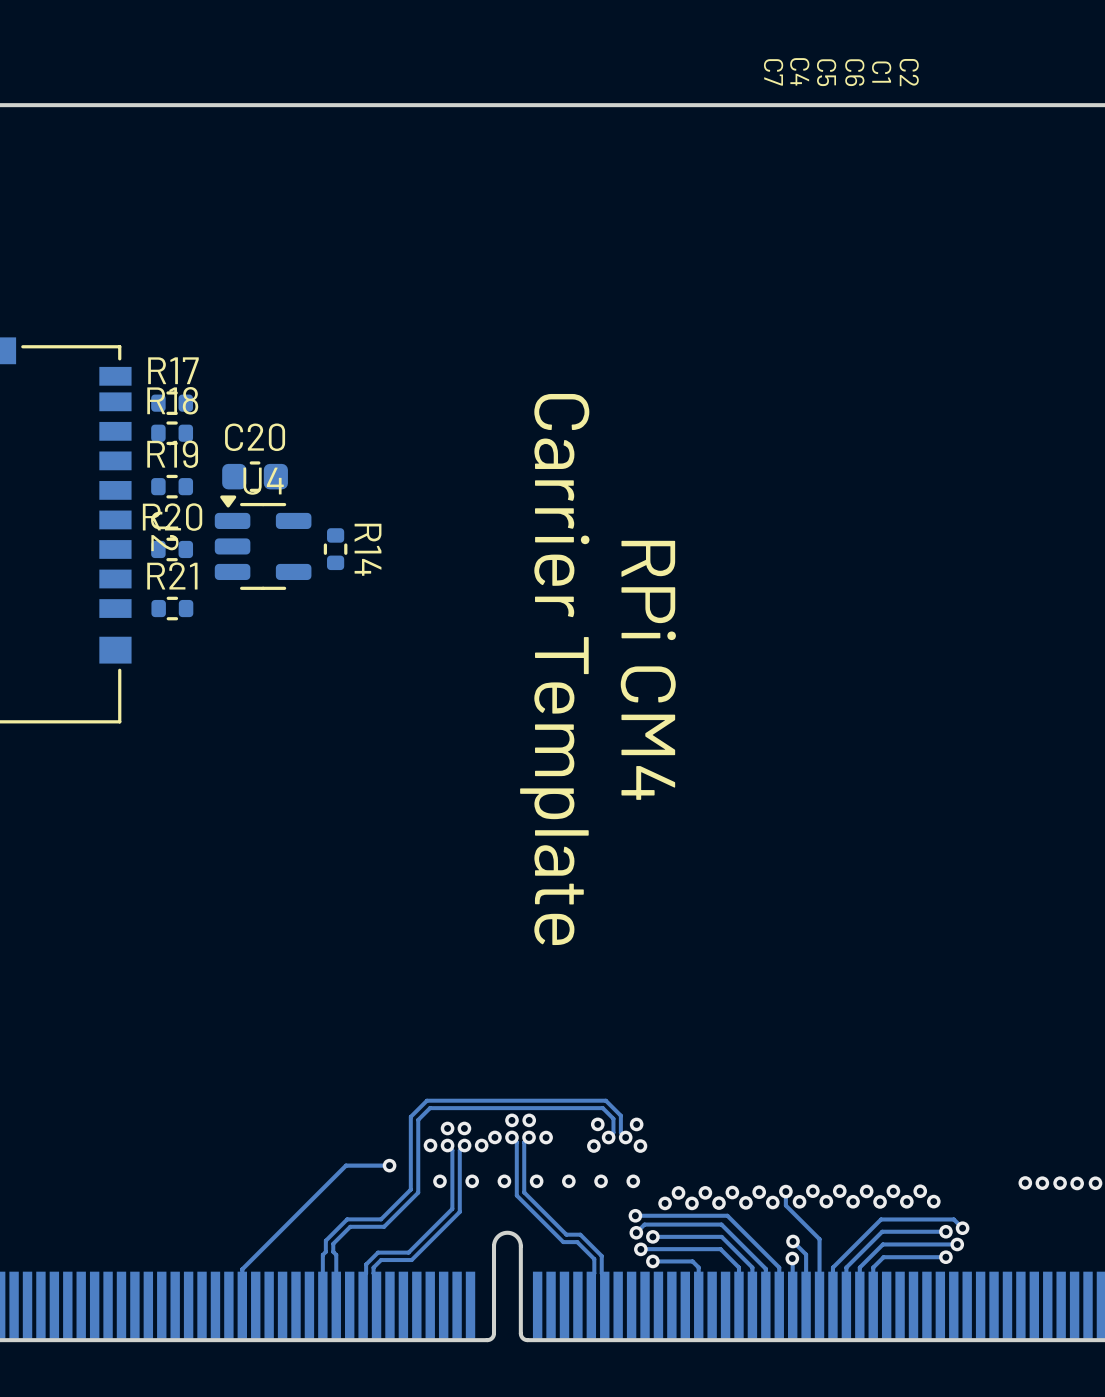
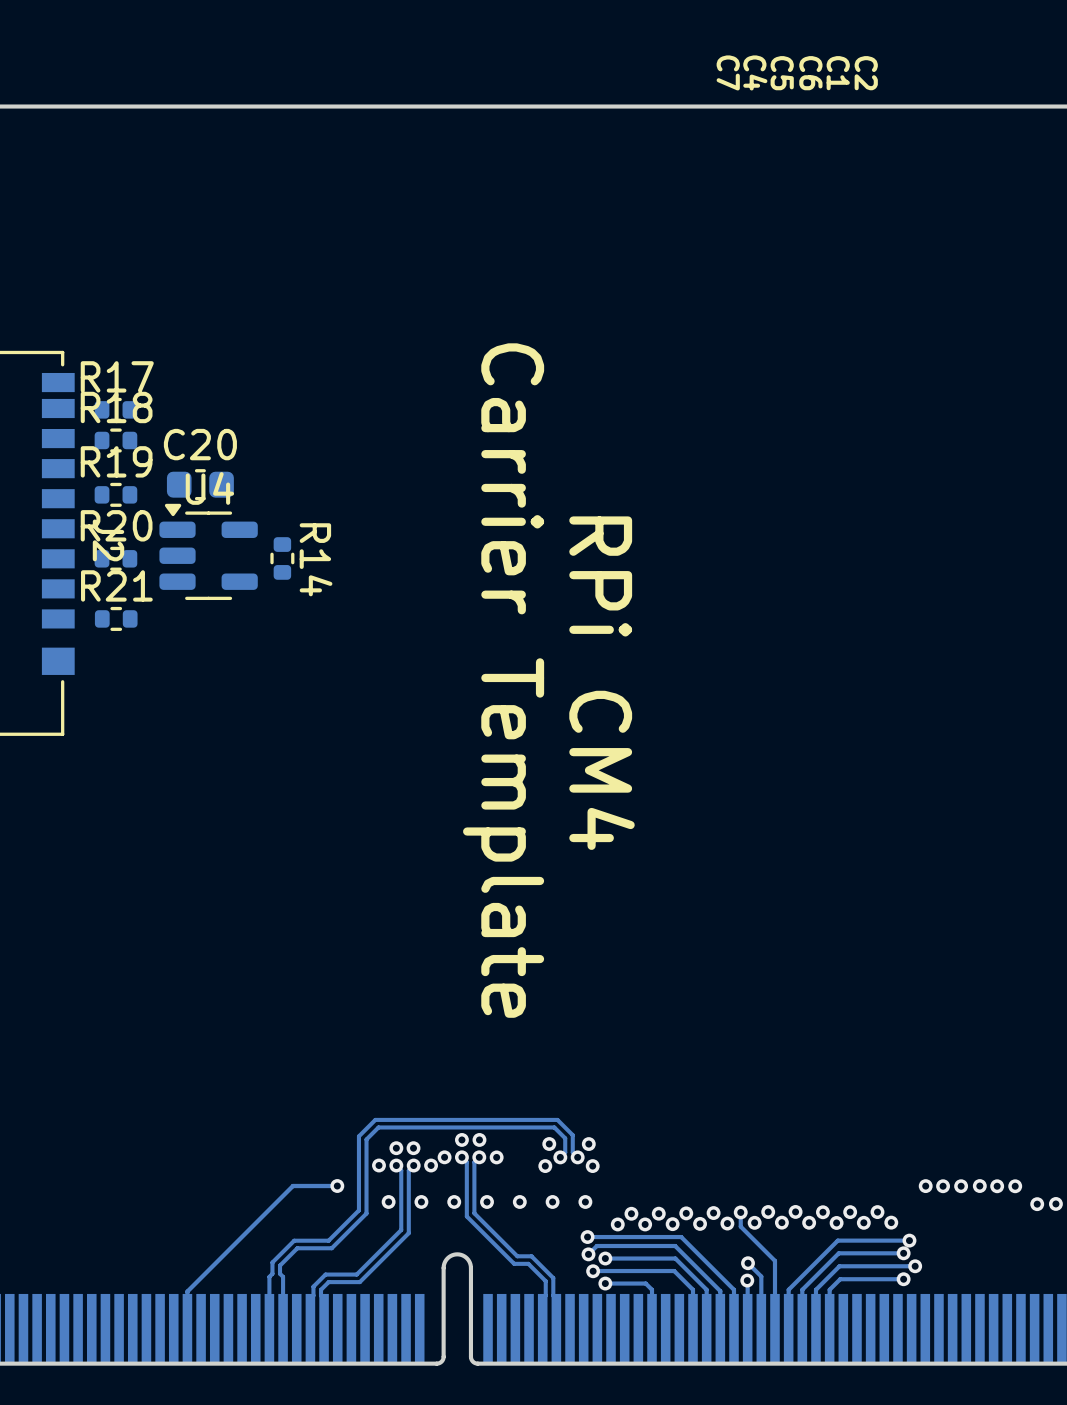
via: none -> (925, 1186)
via: none -> (943, 1186)
via: none -> (961, 1186)
via: none -> (979, 1186)
via: none -> (997, 1186)
via: none -> (1015, 1186)
via: (1025, 1182) -> none
via: (1042, 1183) -> none
via: (1060, 1183) -> none
track: (881, 1219) (953, 1219) (962, 1228) -> (837, 1240) (909, 1240)
via position: (962, 1228) -> (909, 1240)

